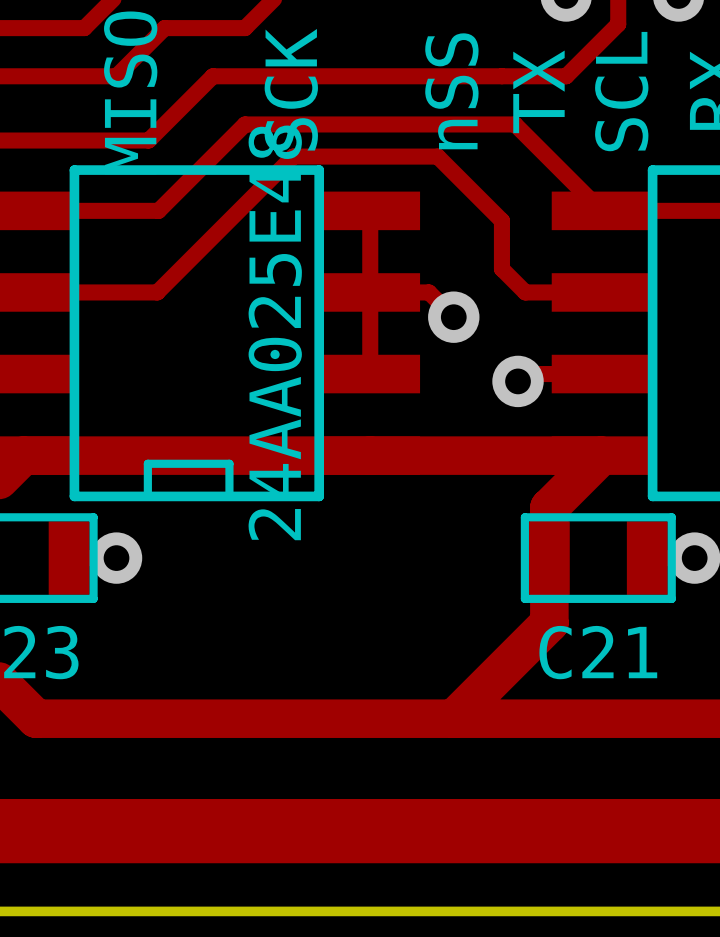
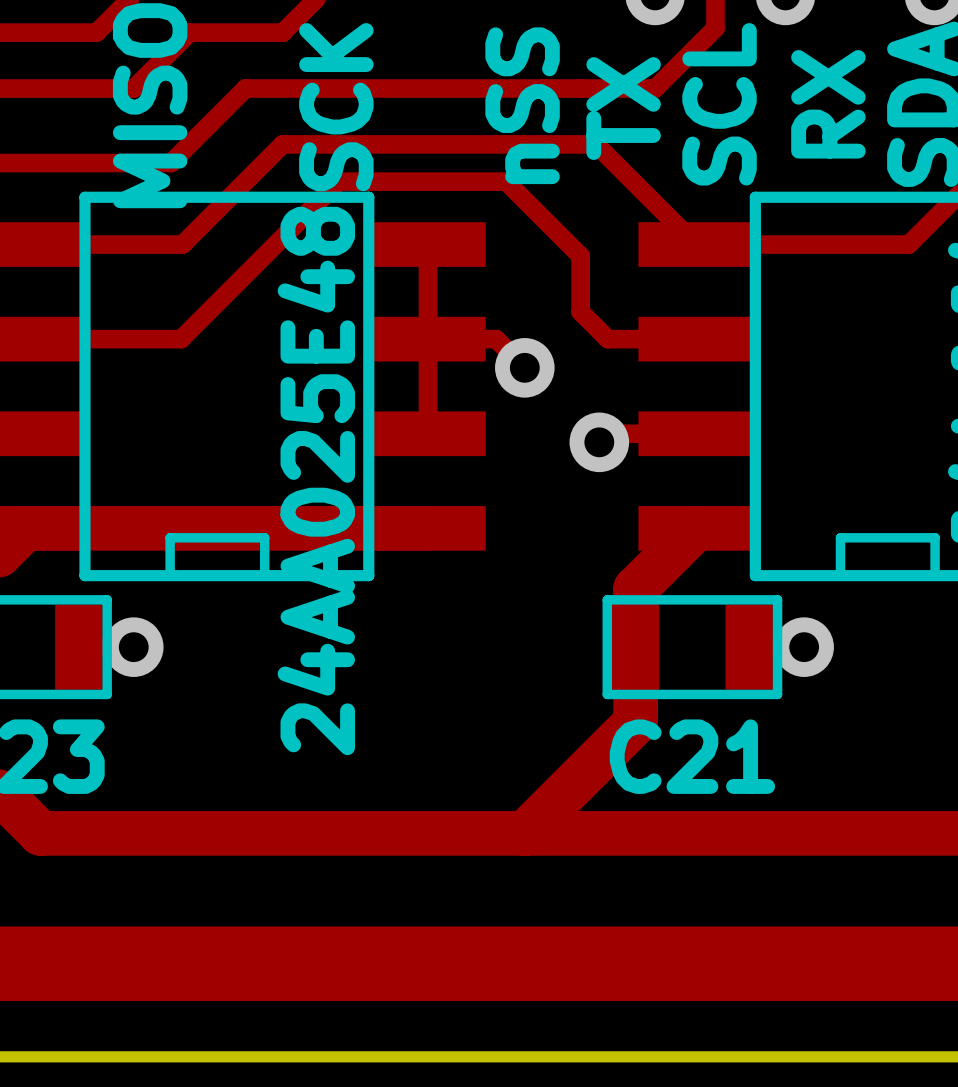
part value position: 24AA025E48 (275, 332) -> 24AA025E48 (316, 480)
top track: (370, 455) (601, 455) -> none

